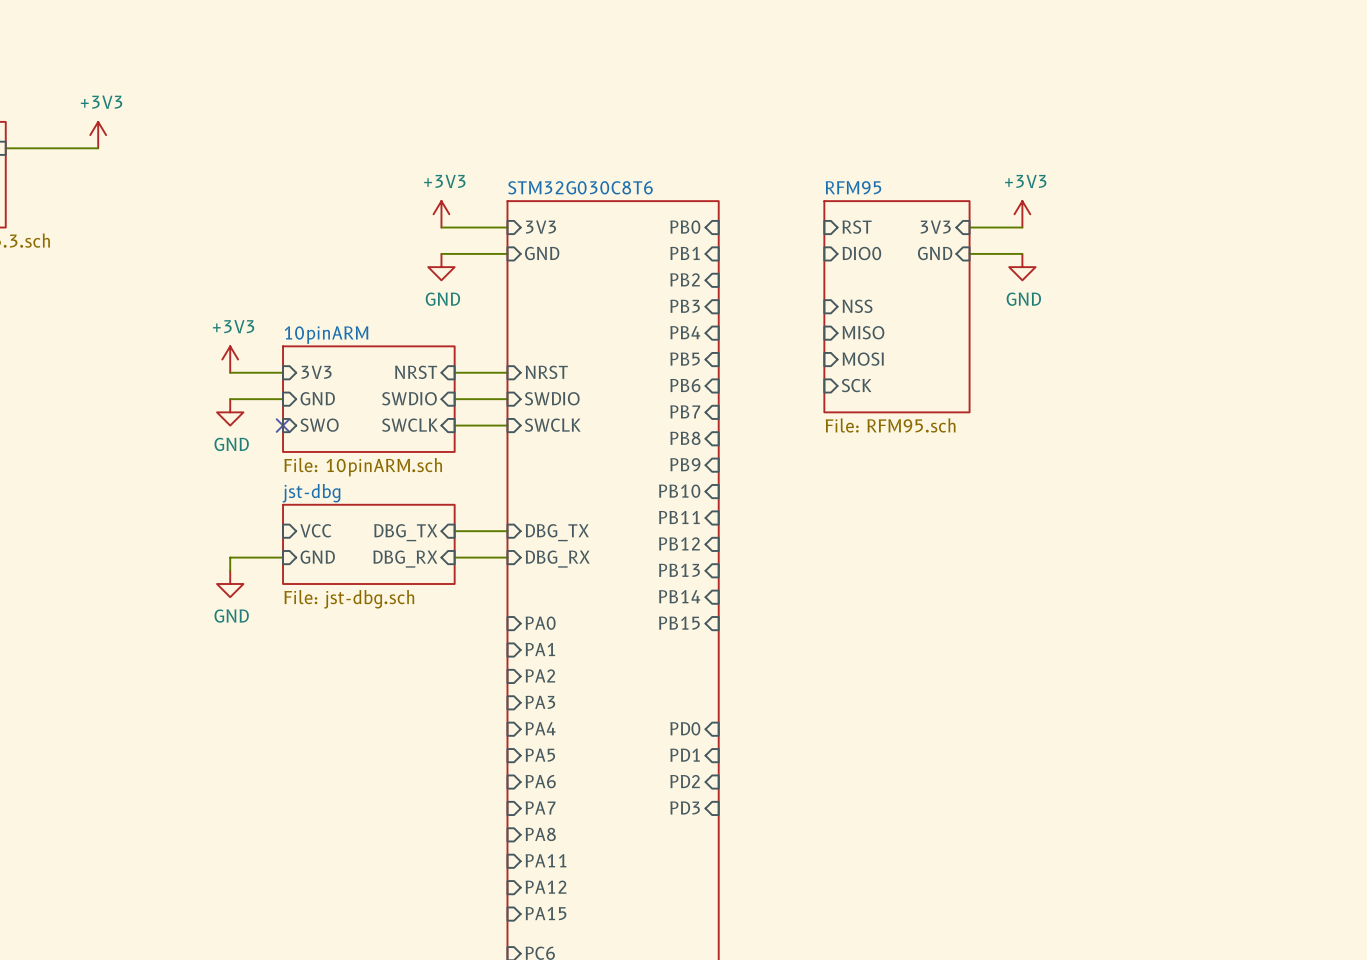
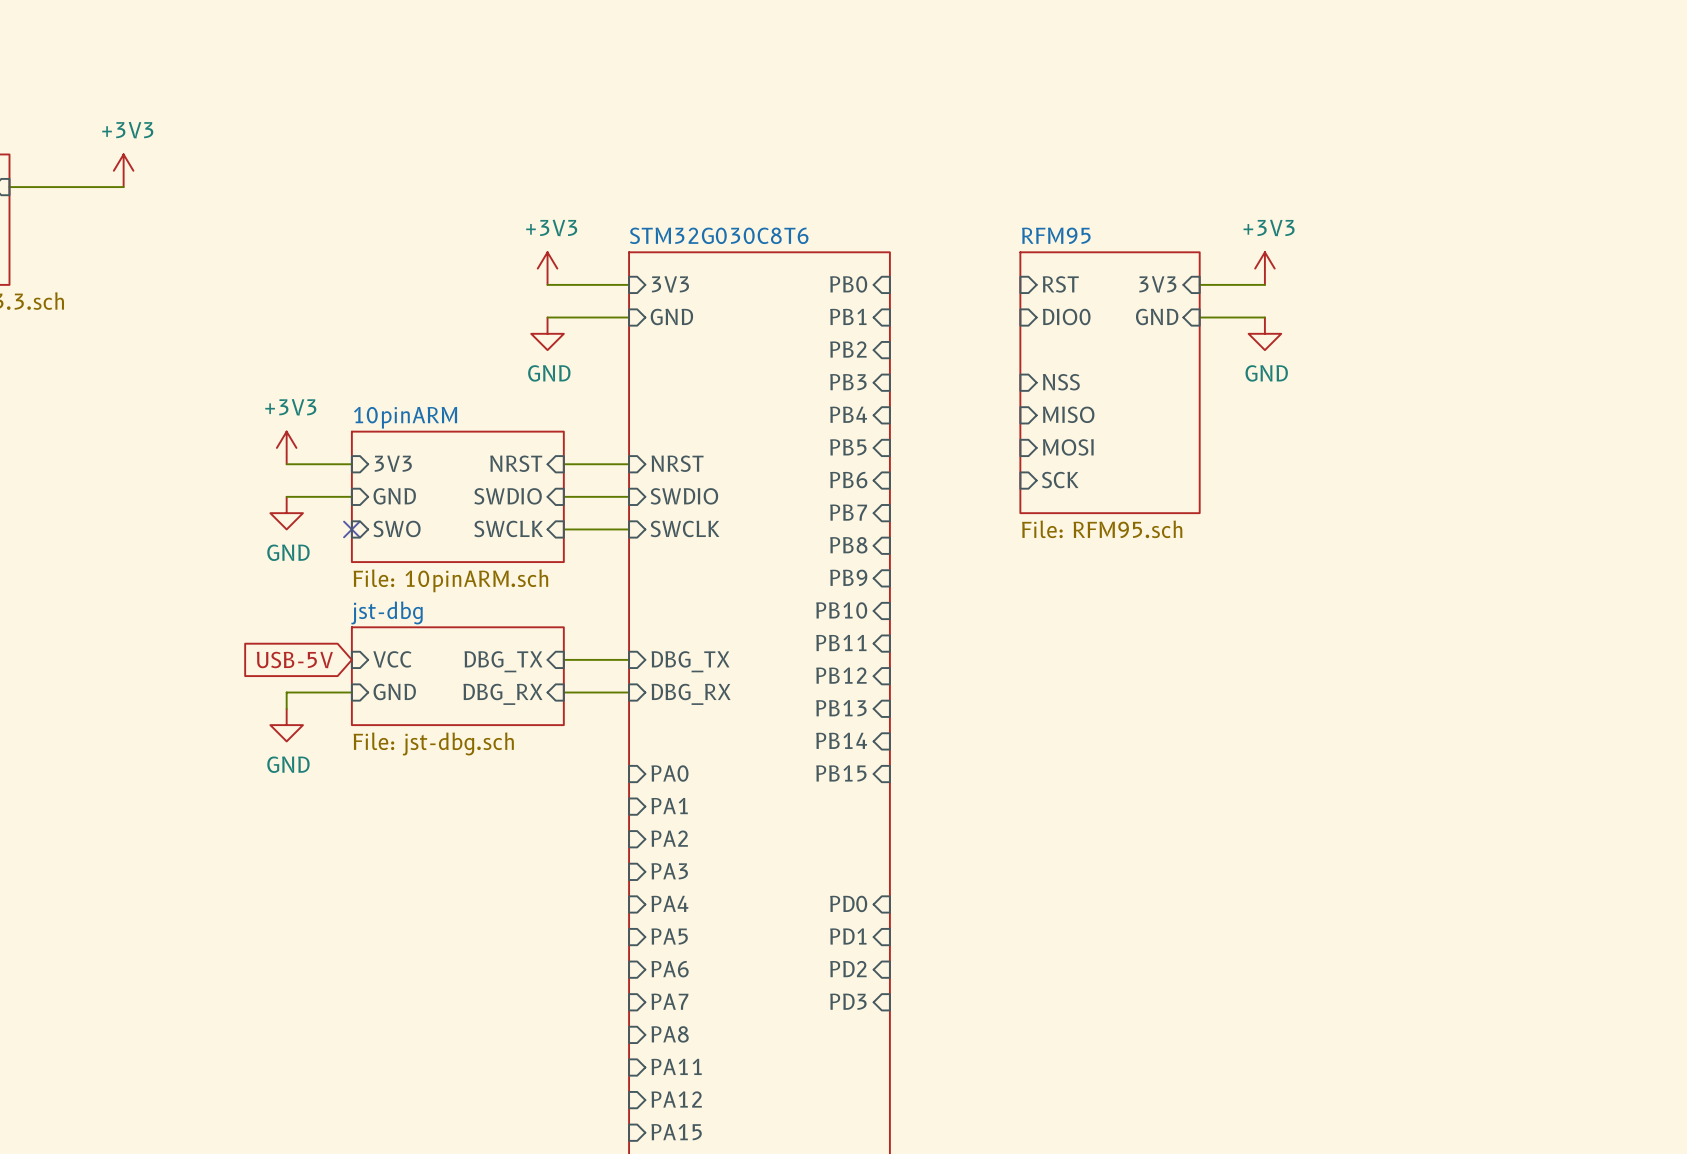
global label: none -> USB-5V (294, 660)

